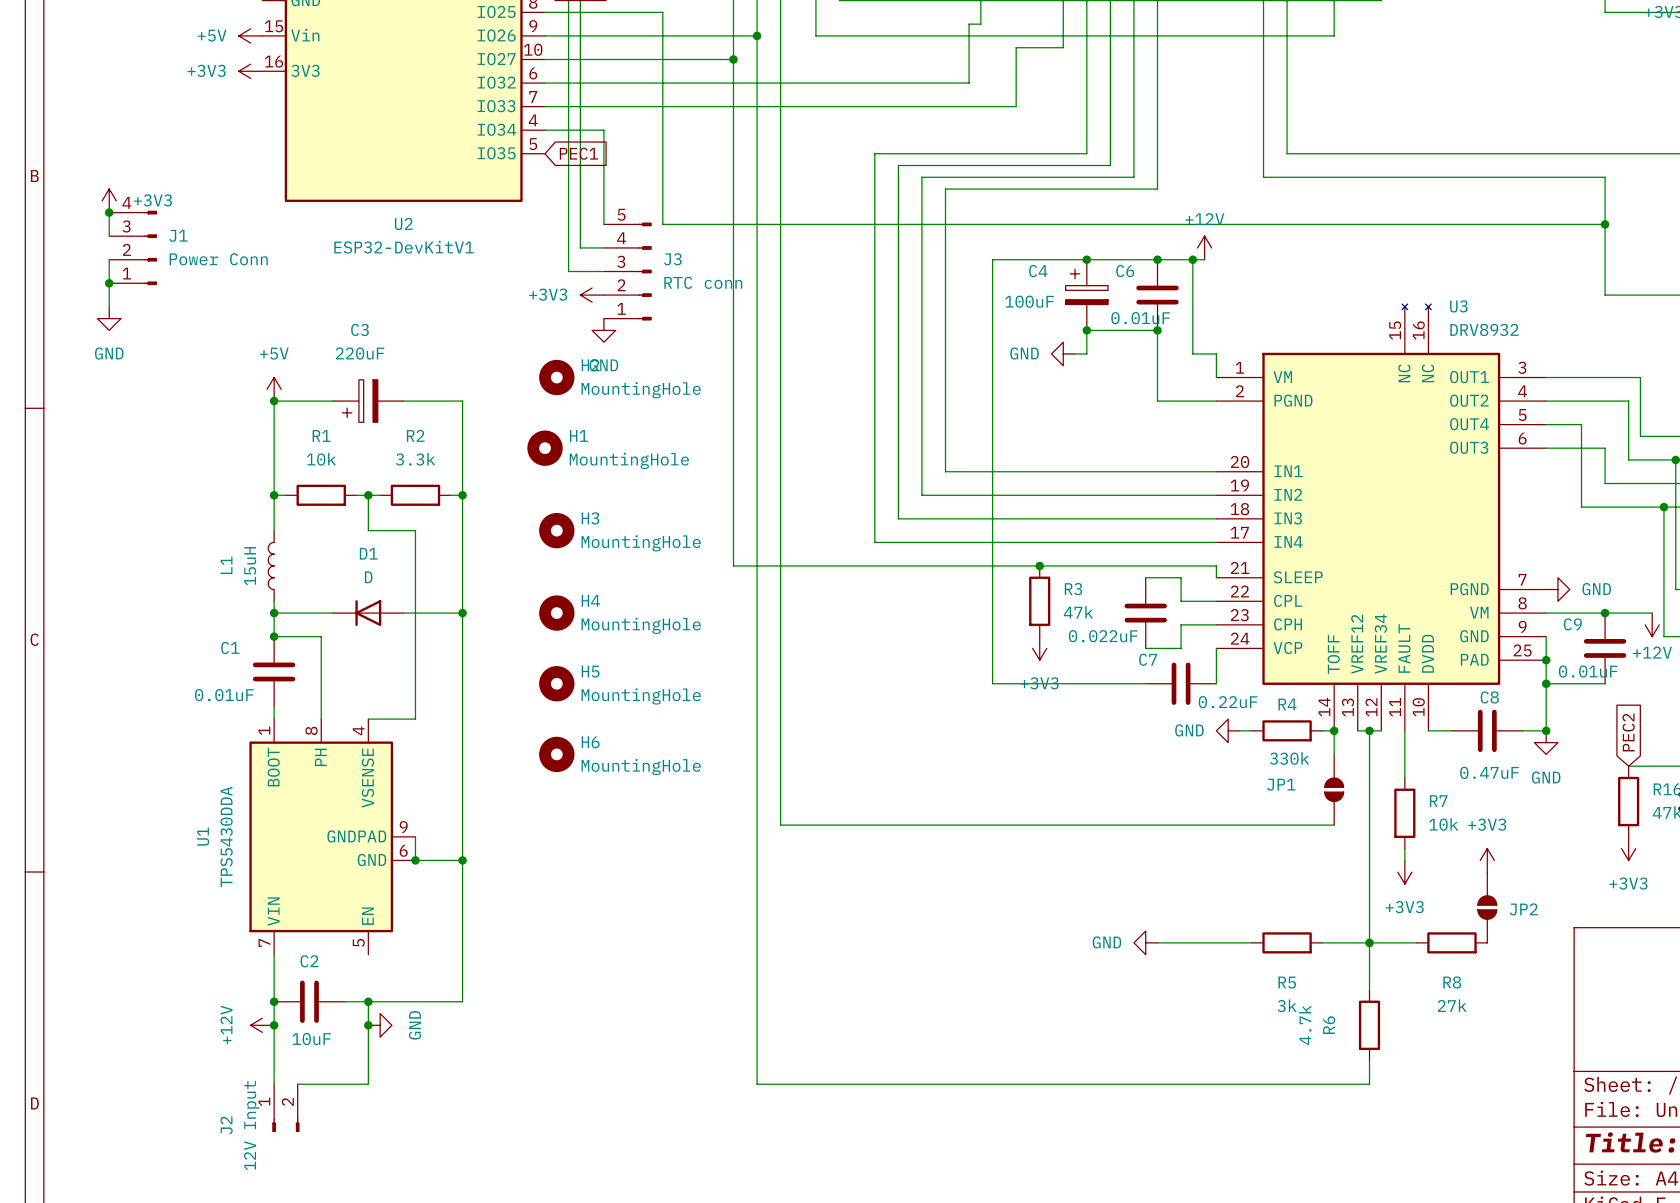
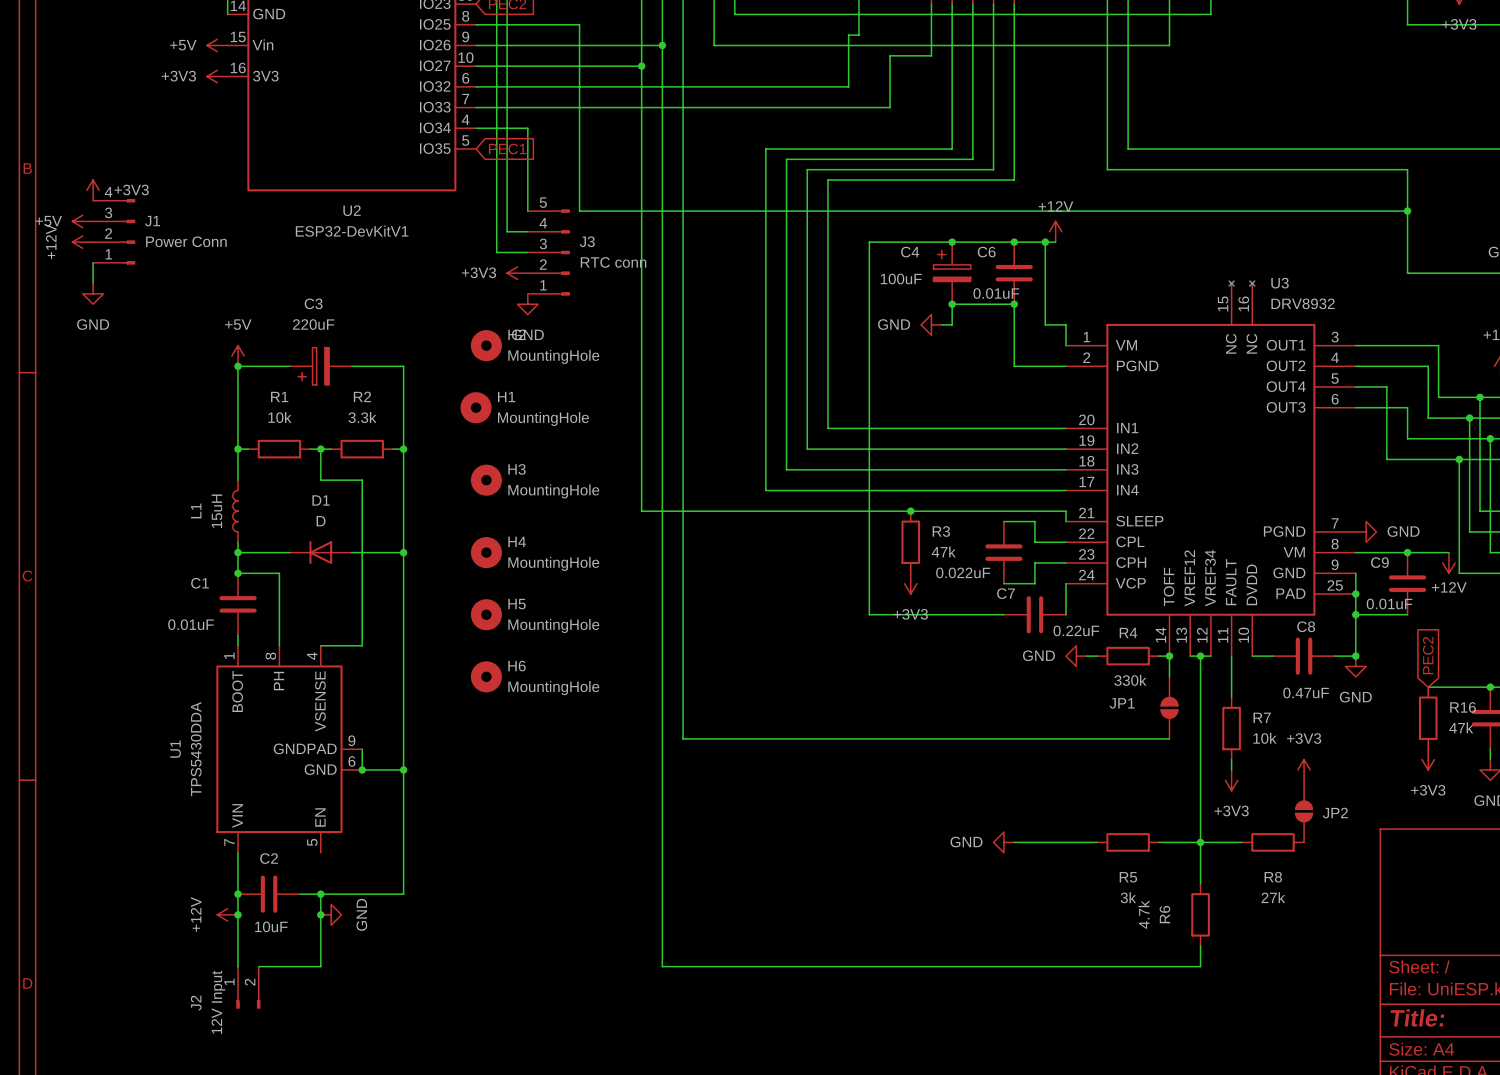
wire: (109, 212) (109, 236) -> none
junction: (109, 212) -> none
power symbol: none -> +5V (82, 221)
power symbol: none -> +12V (82, 242)
wire: (109, 259) (109, 283) -> none
junction: (109, 283) -> none

